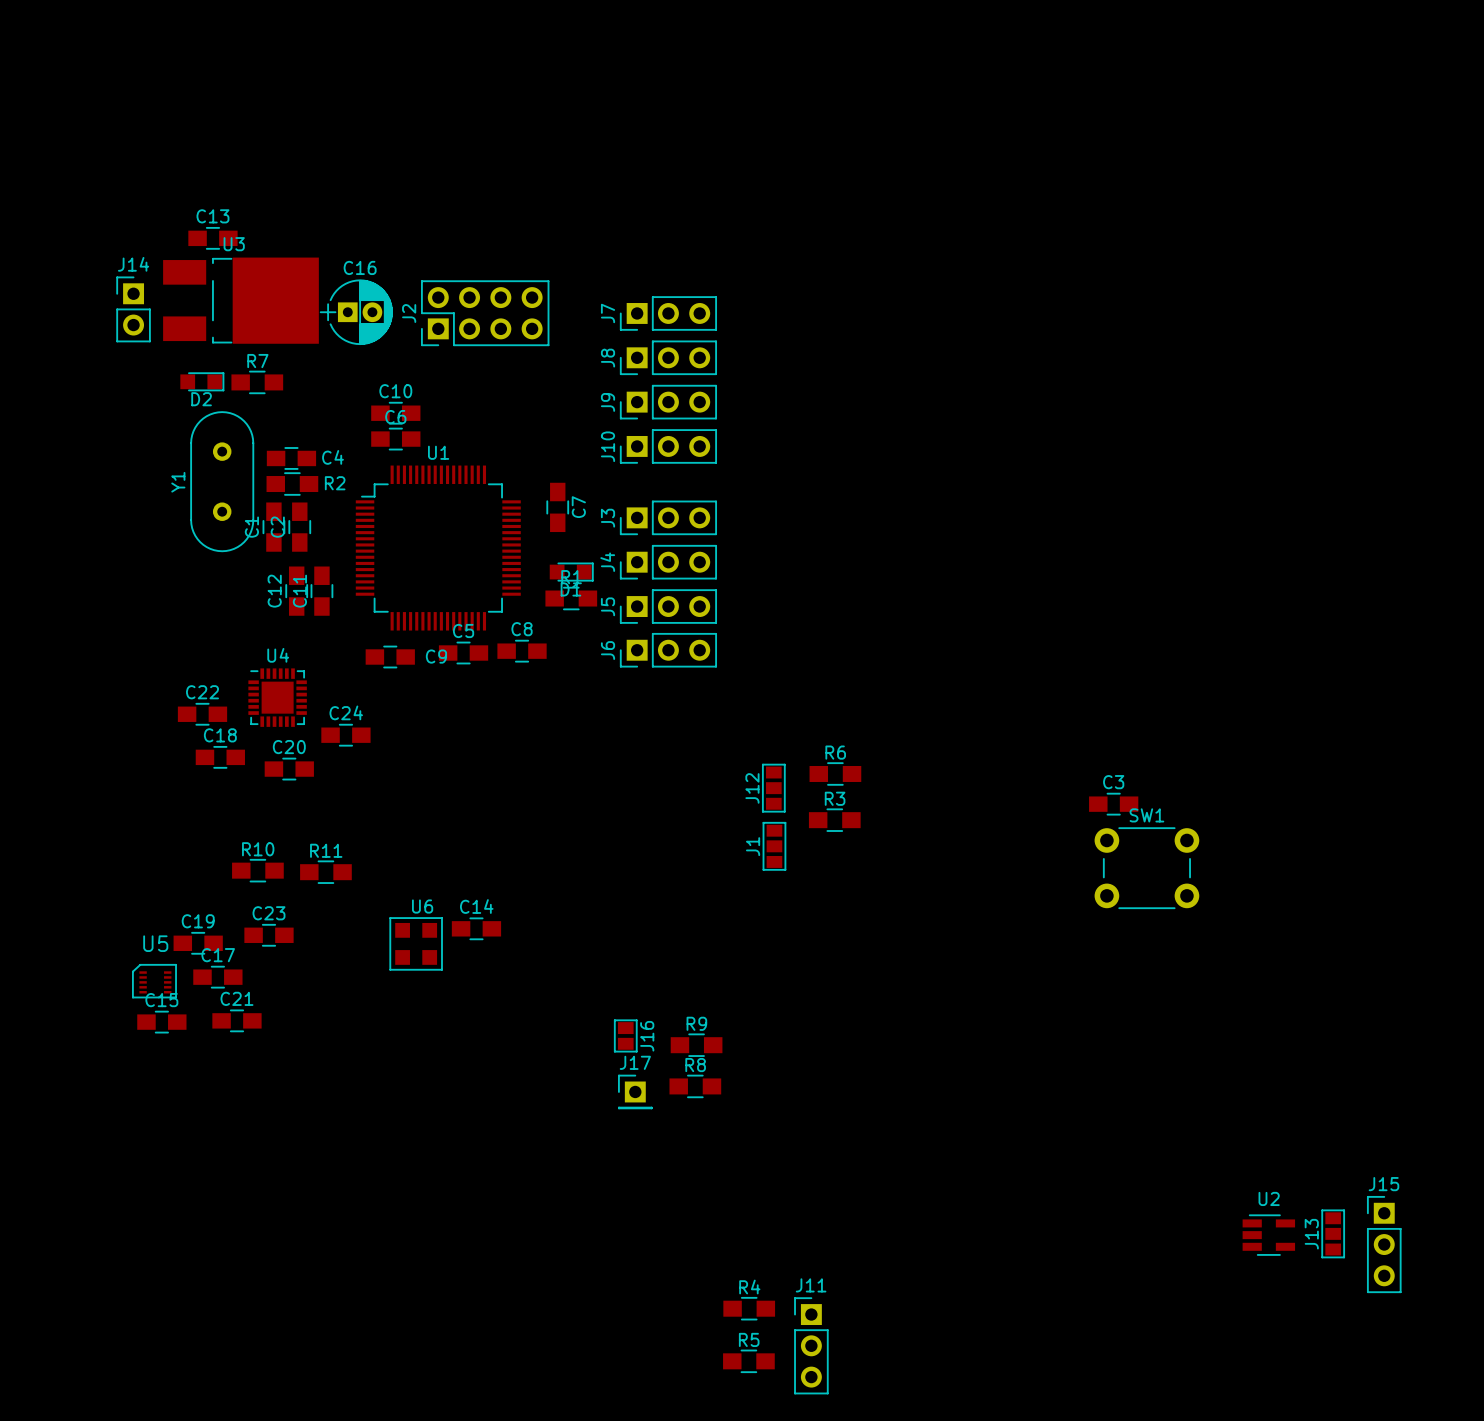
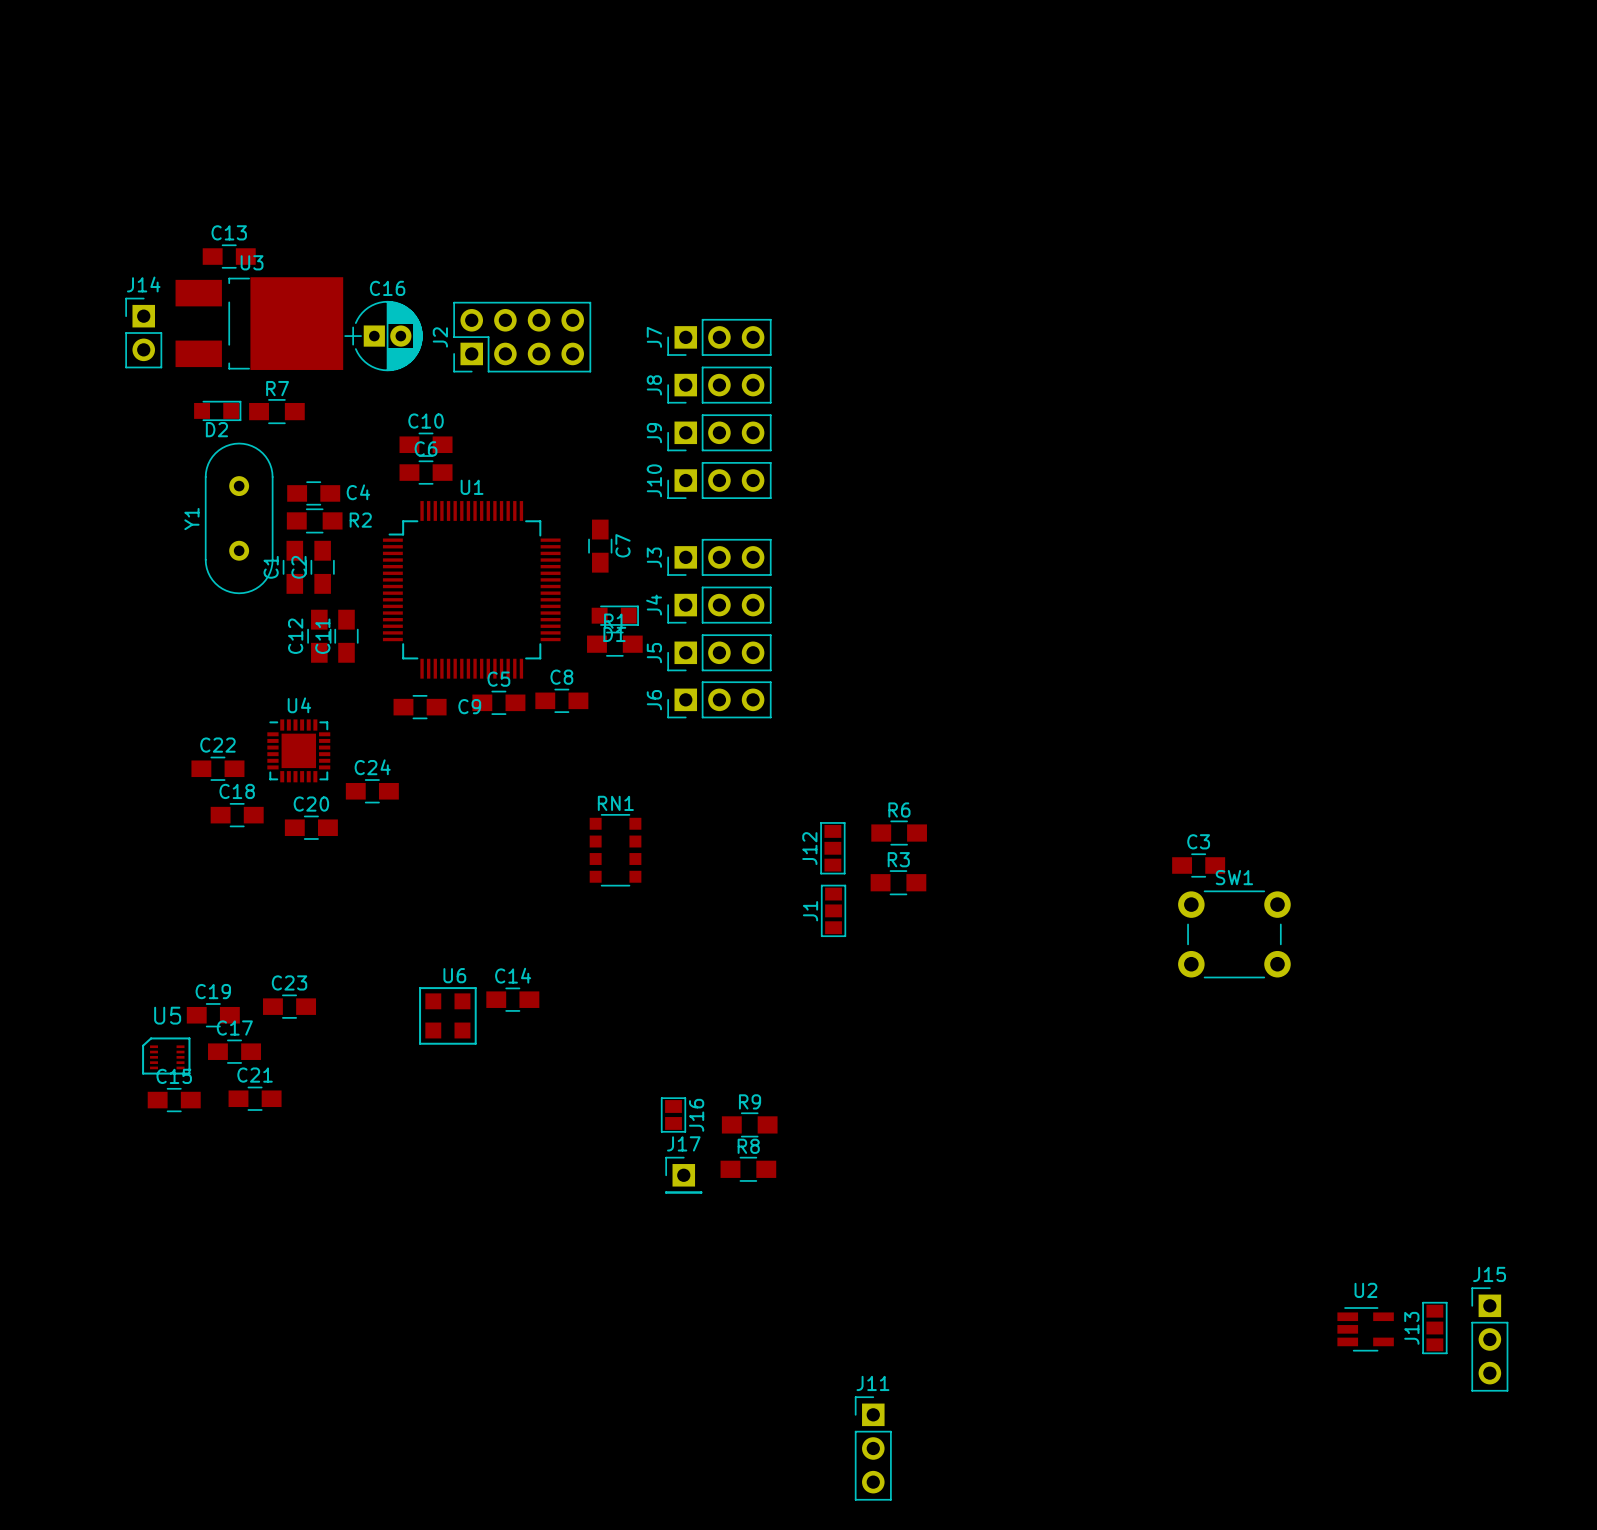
RN1: none -> (615, 850)
R10: (257, 870) -> none
R11: (325, 872) -> none
R4: (749, 1308) -> none
R5: (748, 1361) -> none

